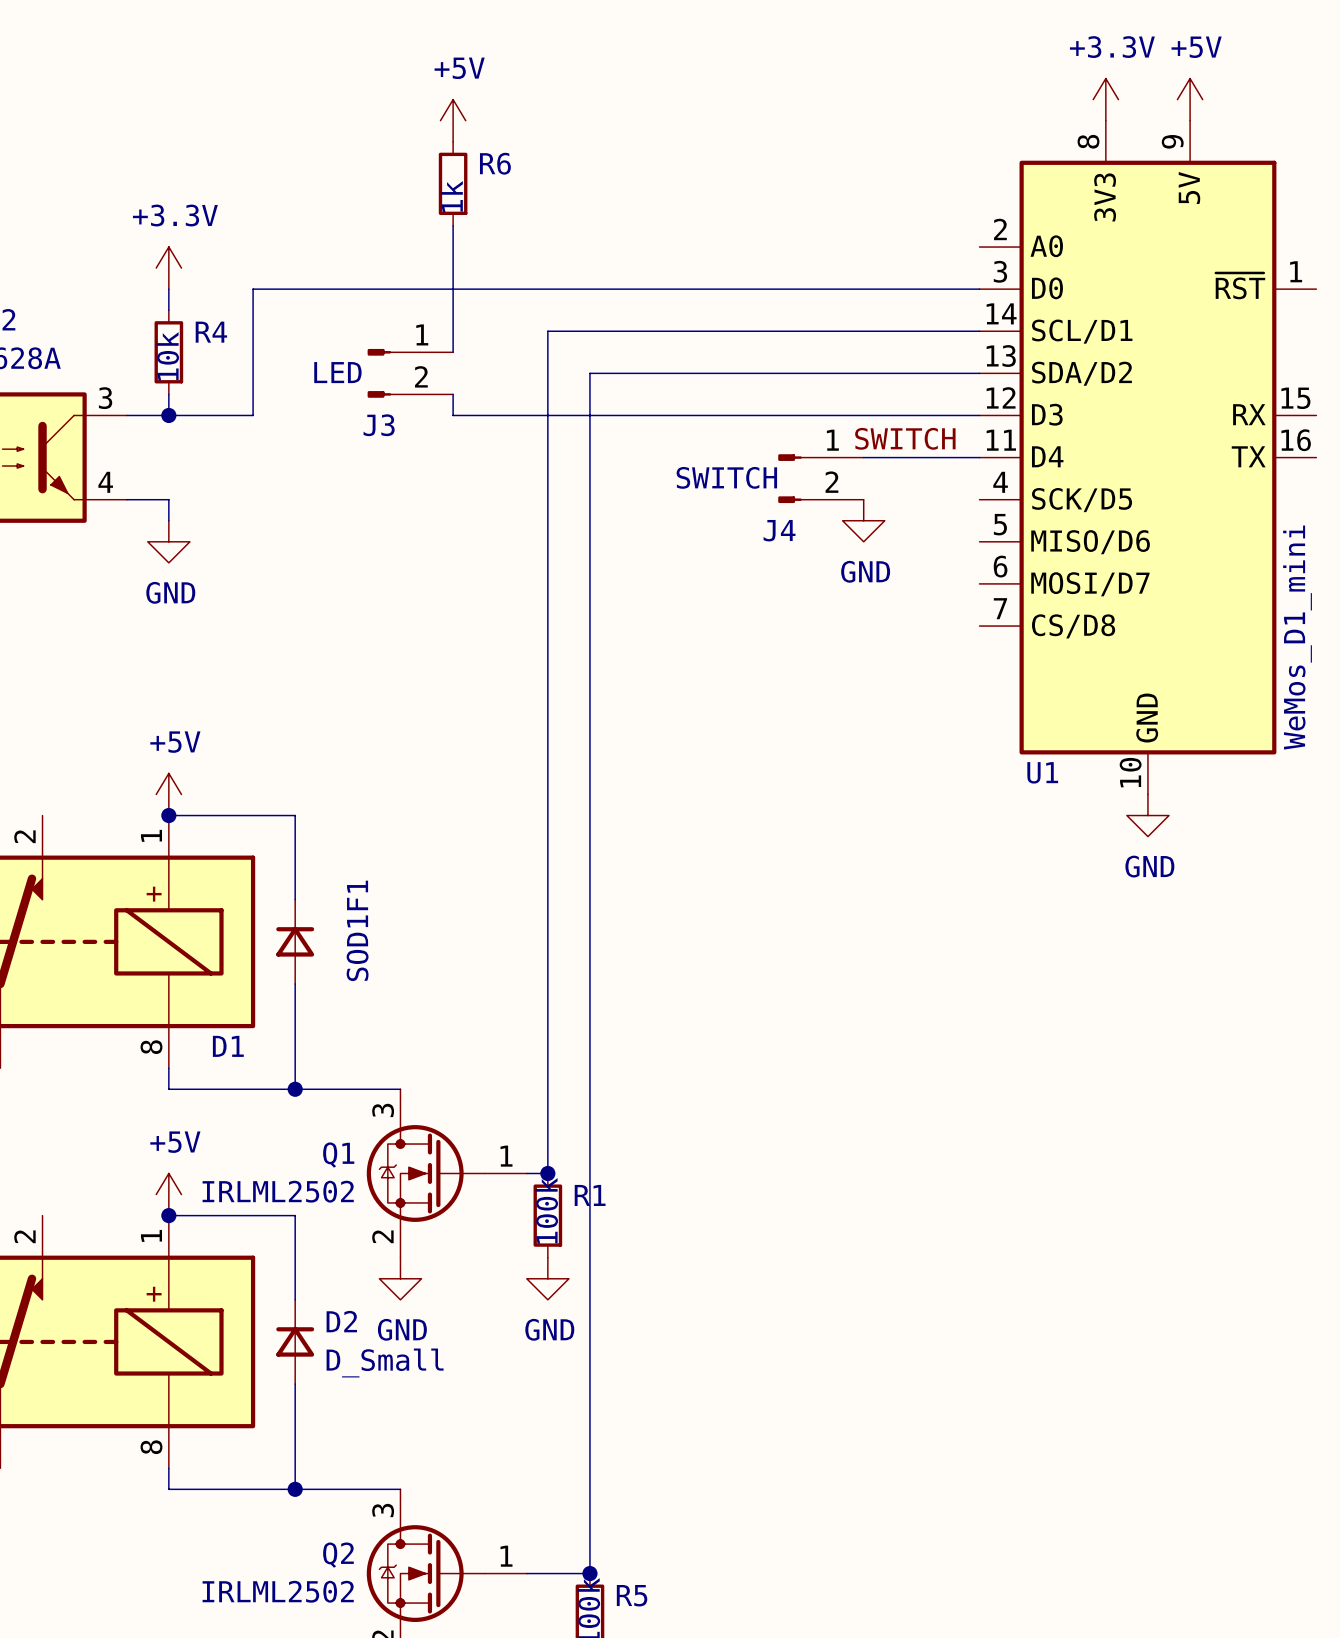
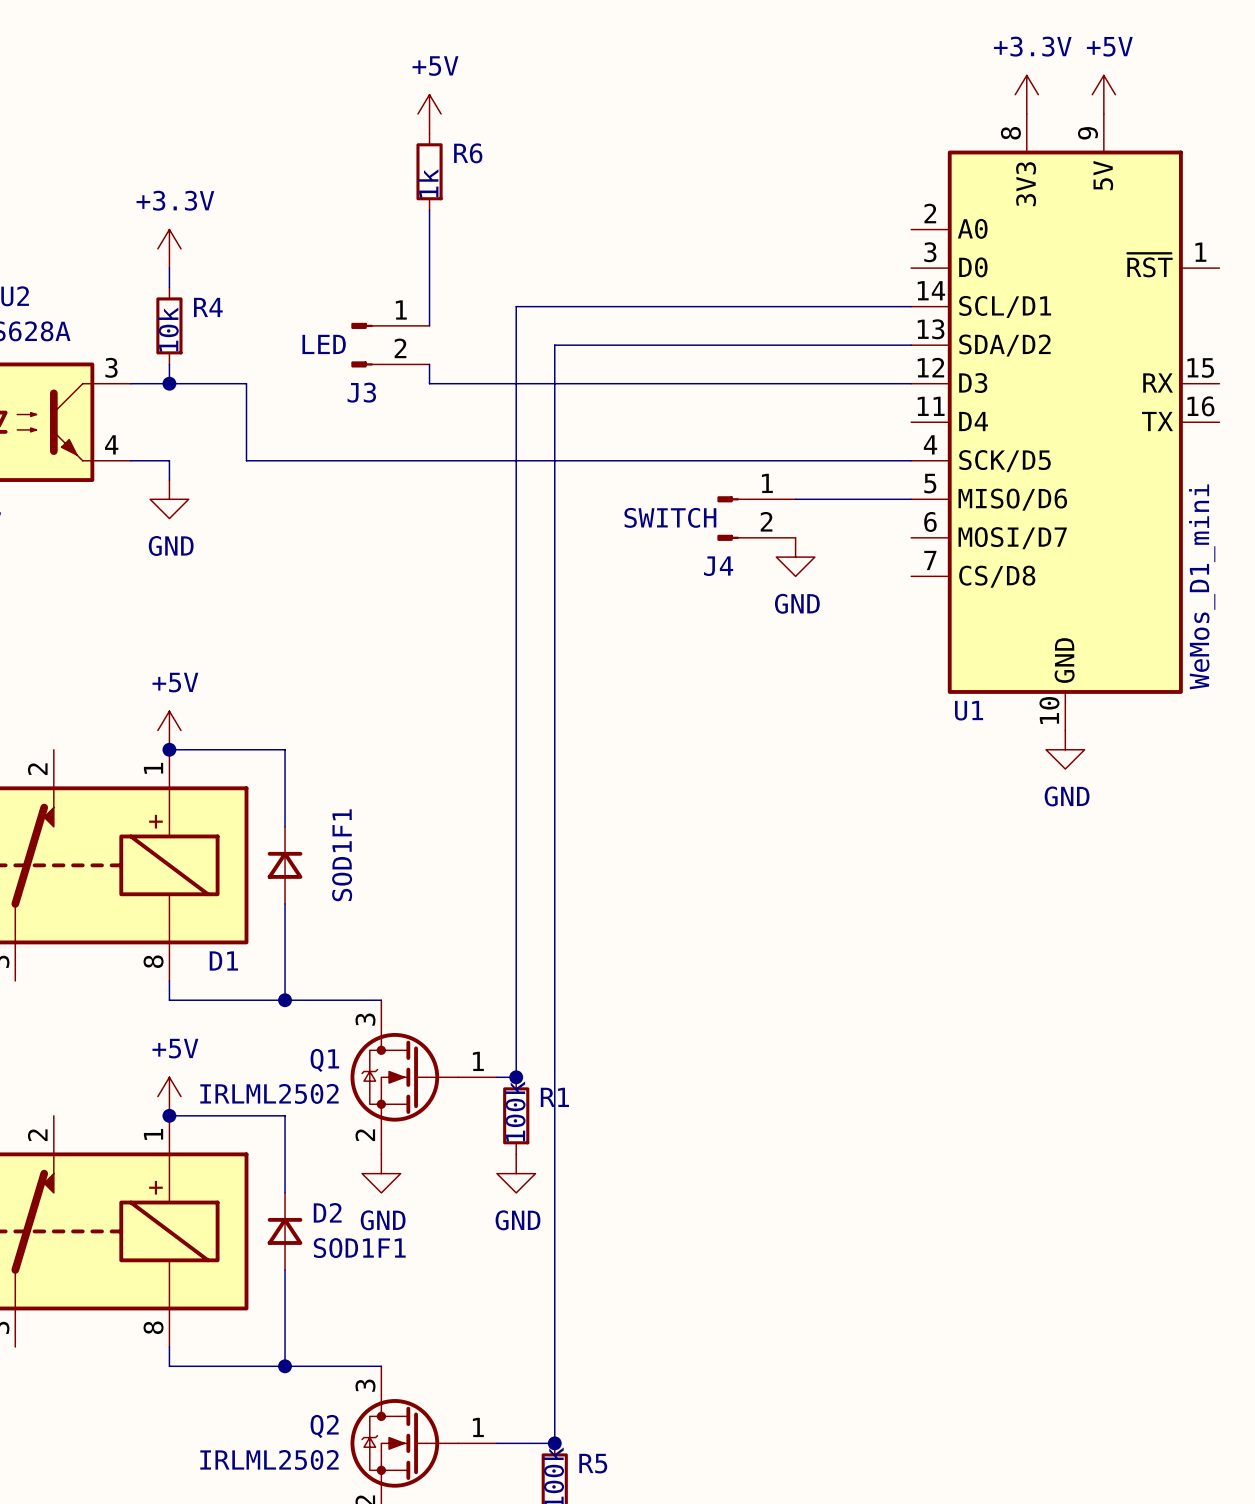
wire: (979, 289) (253, 289) (253, 415) -> (911, 460) (246, 460) (246, 383)
label: SWITCH (905, 438) -> none
wire: (863, 457) (979, 457) -> none
J4 position: (820, 478) -> (756, 518)
power symbol position: GND (863, 520) -> GND (795, 557)
wire: none -> (795, 499) (911, 499)
D2 value: D_Small (385, 1362) -> SOD1F1 (359, 1248)

